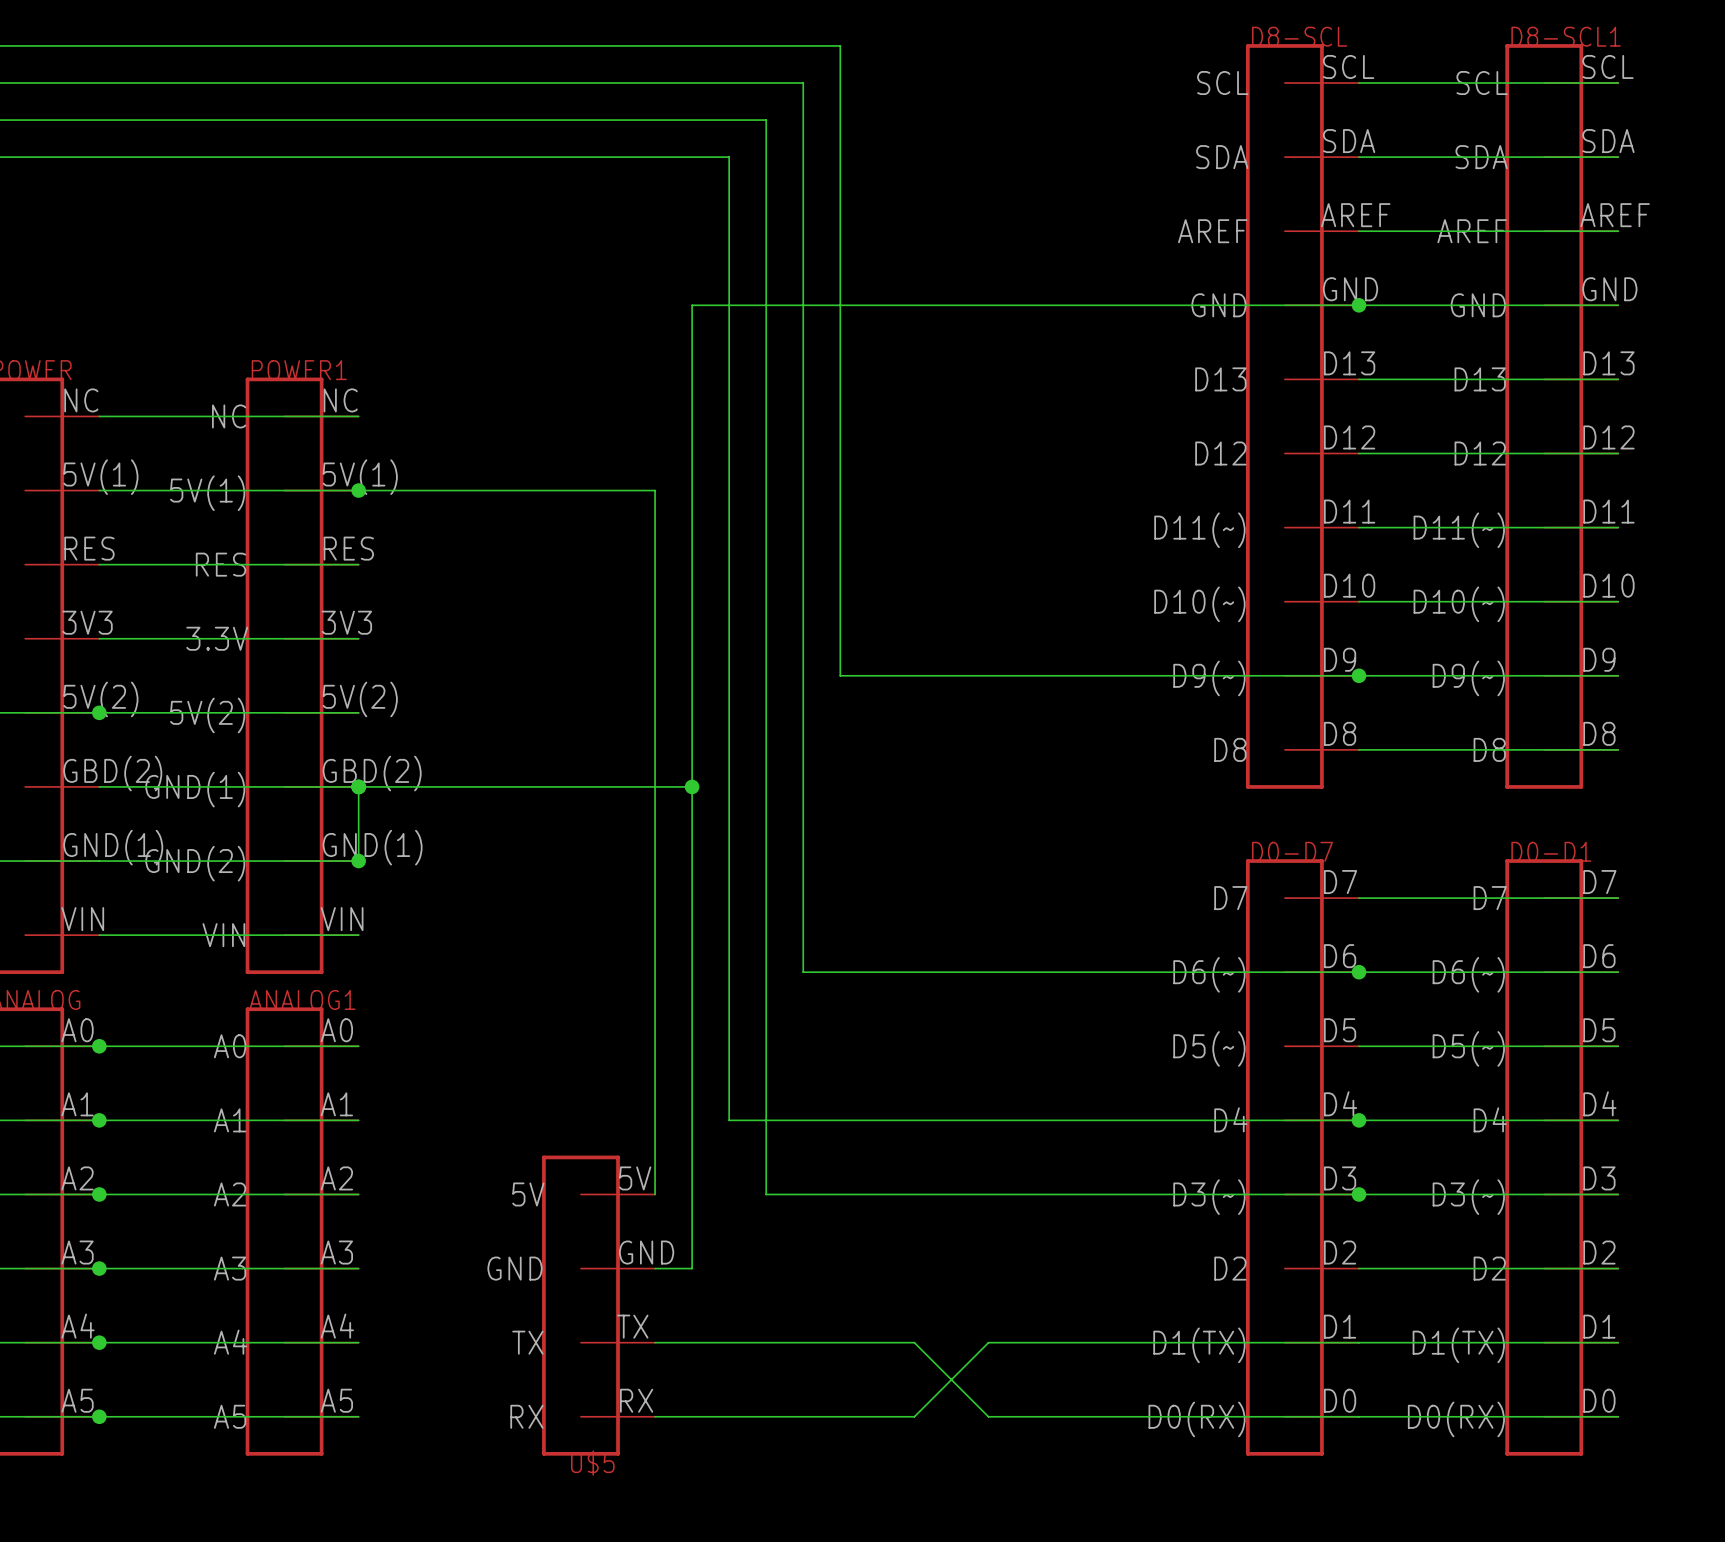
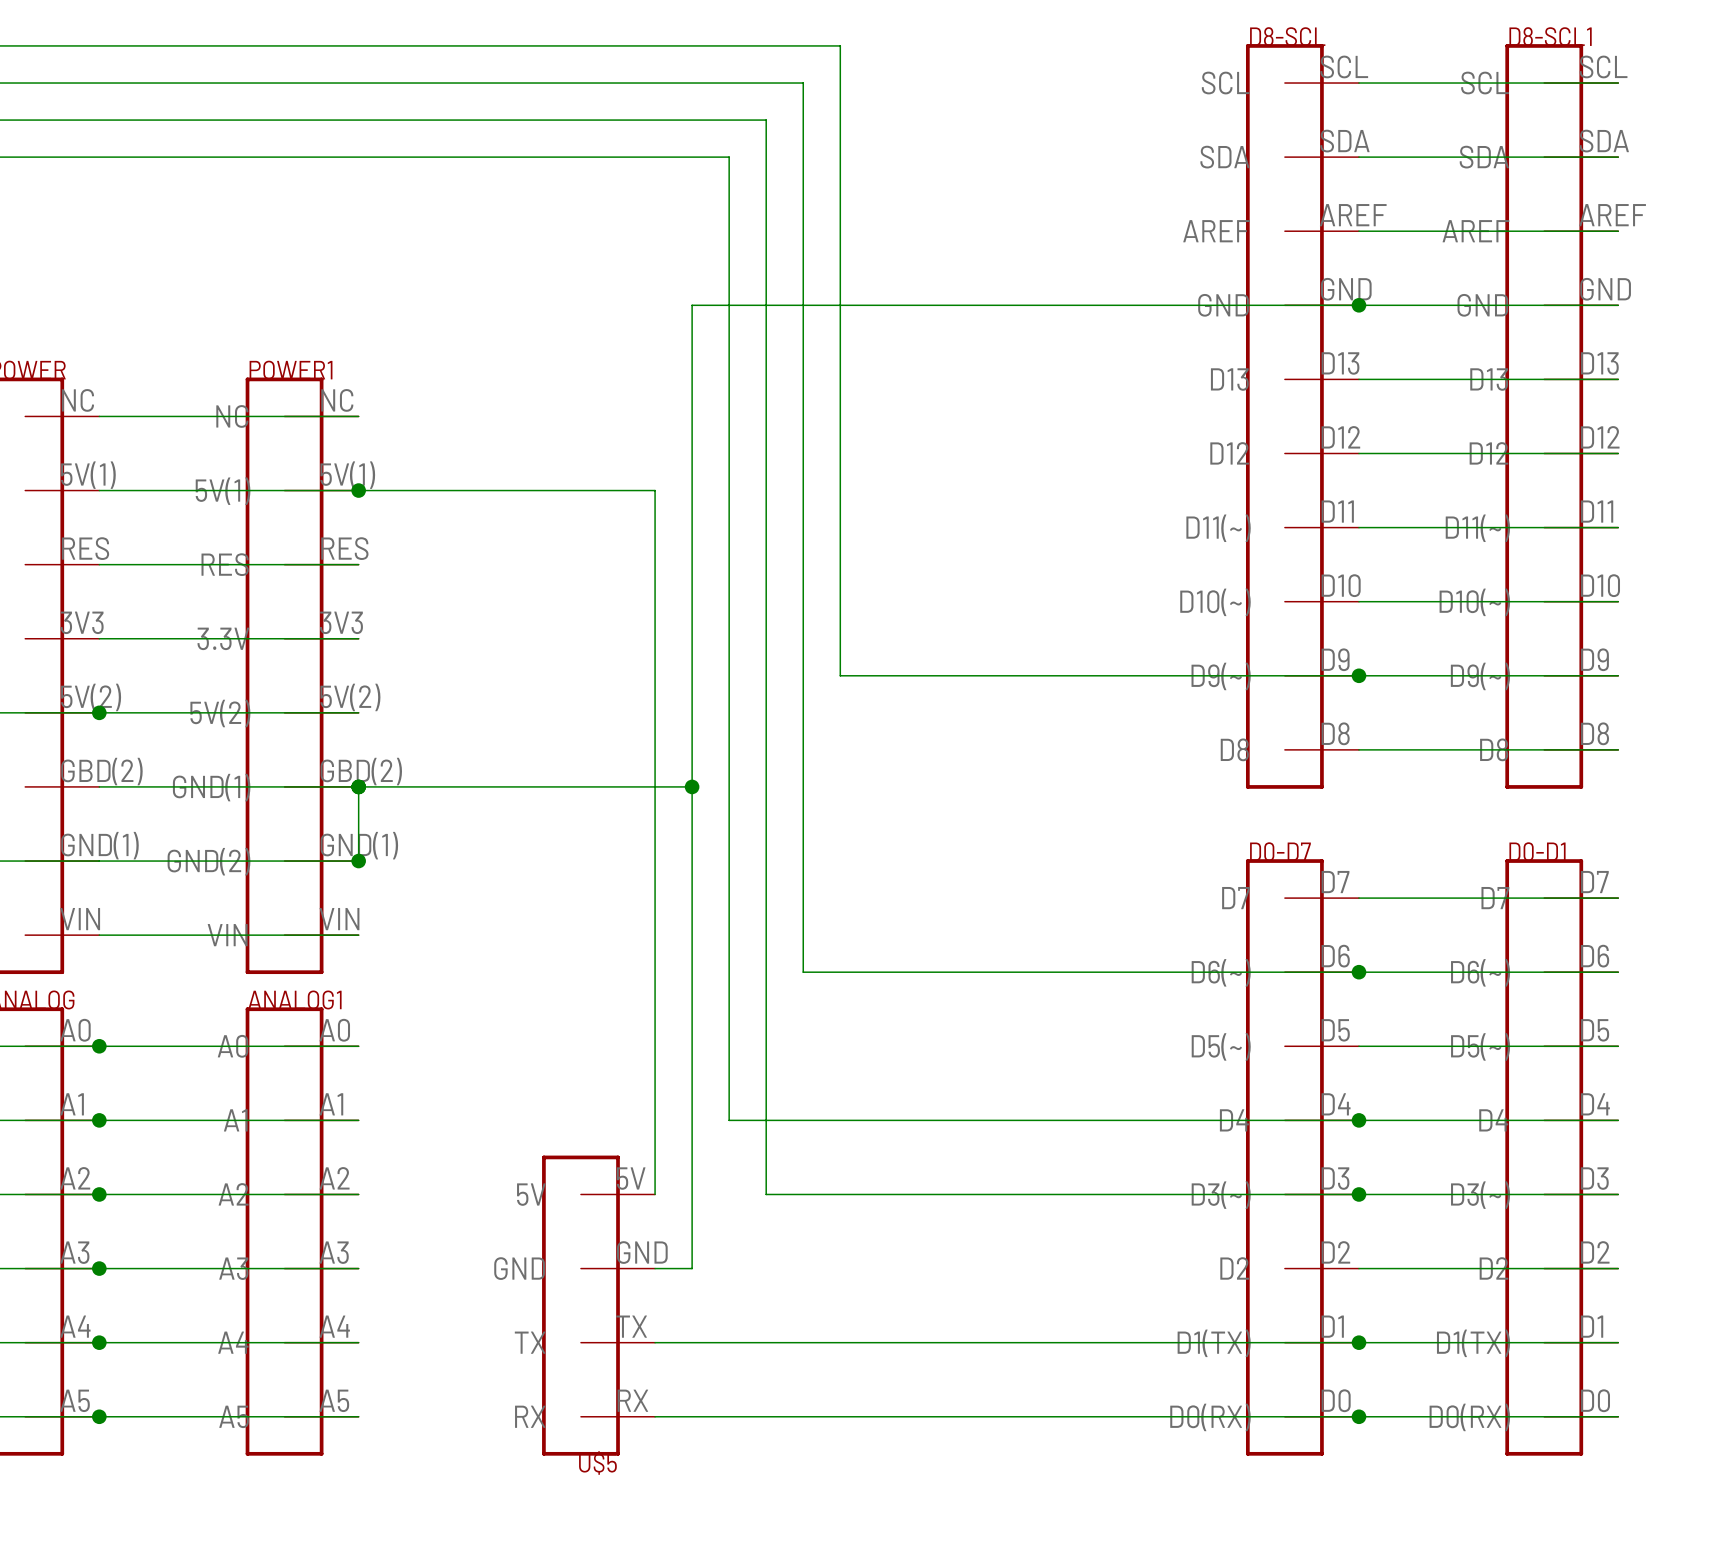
wire: (914, 1342) (988, 1416) -> (914, 1342) (988, 1342)
wire: (988, 1342) (914, 1416) -> (988, 1416) (914, 1416)
junction: none -> (1358, 1342)
junction: none -> (1358, 1416)

